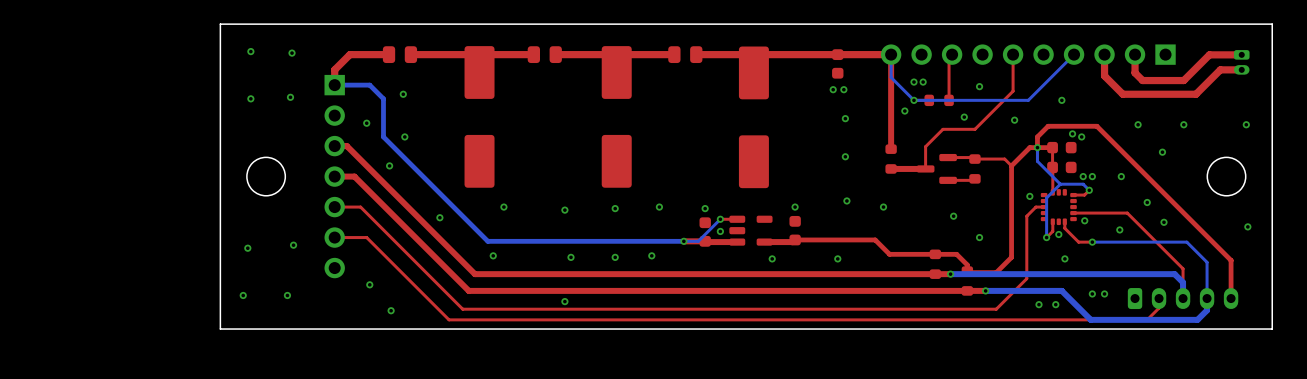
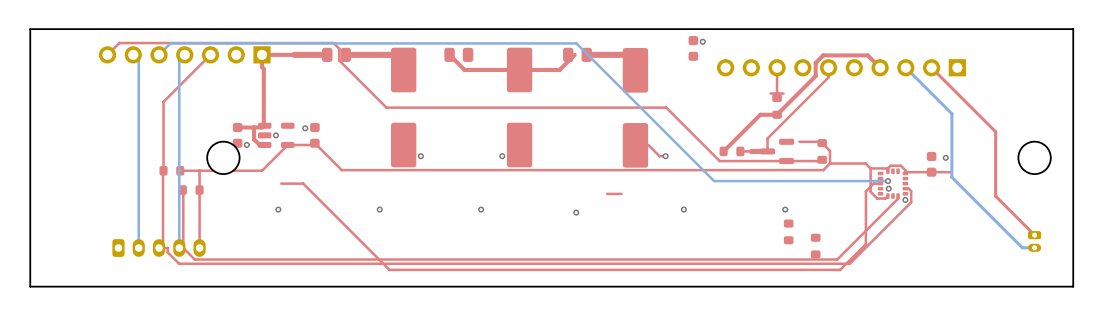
board edge: (220, 24) (220, 329) -> (184, 29) (30, 29) (30, 286) (184, 286)
via: none -> (702, 41)
via: (250, 51) -> none
via: (292, 53) -> none
top track: none -> (107, 54) (119, 43) (333, 43) (339, 48) (339, 60) (386, 107) (666, 107) (719, 161) (799, 161)
bottom track: none -> (133, 54) (138, 60) (138, 248)
bottom track: none -> (159, 54) (170, 43) (576, 43) (714, 181) (887, 181)
bottom track: none -> (184, 54) (179, 60) (179, 248)
top track: none -> (210, 54) (163, 101) (162, 248)
top track: (349, 54) (334, 69) (334, 85) -> (294, 54) (262, 54) (263, 125)
top track: (533, 54) (487, 54) (479, 62) (479, 72) -> (449, 54) (464, 69) (559, 69) (574, 54)
top track: (555, 54) (609, 54) (616, 62) (616, 72) -> none
top track: (674, 54) (625, 54) (616, 63) -> none
top track: (952, 54) (949, 57) (949, 100) -> none
top track: (1013, 54) (1013, 91) (974, 129) (942, 129) (925, 146) (925, 168) (910, 168) -> (828, 67) (828, 77) (767, 138) (767, 151)
part position: (1028, 54) -> (841, 67)
bottom track: (1074, 54) (1028, 100) (913, 100) (891, 77) (891, 54) -> none
top track: (1104, 54) (1104, 75) (1122, 94) (1196, 94) (1220, 69) (1241, 69) -> none
top track: (1135, 54) (1135, 72) (1142, 80) (1183, 80) (1209, 54) (1241, 54) -> none
part position: (1241, 62) -> (1034, 241)
part position: (837, 63) -> (693, 48)
top track: none -> (777, 67) (777, 98)
top track: none -> (880, 67) (867, 55) (823, 55) (815, 62) (815, 76) (777, 114) (760, 114) (723, 151)
bottom track: none -> (905, 67) (951, 113) (951, 177) (1022, 247) (1034, 247)
top track: none -> (931, 67) (995, 131) (995, 196) (1034, 235)
top track: (753, 74) (753, 66) (766, 54) (891, 54) (891, 149) -> none
via: (913, 82) -> none
via: (923, 82) -> none
bottom track: (334, 85) (369, 85) (383, 98) (383, 136) (487, 241) (698, 241) (720, 219) -> none
via: (979, 86) -> none
via: (833, 89) -> none
via: (843, 89) -> none
via: (403, 94) -> none
via: (290, 97) -> none
via: (250, 98) -> none
via: (913, 100) -> none
part rotation: 0° (939, 100) -> 90° clockwise (777, 106)
part position: (939, 100) -> (777, 106)
via: (1061, 100) -> none
via: (904, 111) -> none
via: (964, 117) -> none
via: (845, 118) -> none
via: (1014, 120) -> none
via: (366, 123) -> none
via: (1138, 124) -> none
via: (1183, 124) -> none
via: (1246, 124) -> none
via: (1072, 133) -> none
via: (404, 136) -> none
via: (1081, 136) -> none
top track: none -> (263, 125) (262, 127) (237, 127)
top track: none -> (254, 127) (254, 139) (259, 145) (264, 145)
via: none -> (305, 128)
top track: (334, 146) (346, 146) (474, 274) (950, 274) -> none
top track: (1037, 147) (1037, 136) (1048, 126) (1096, 126) (1231, 260) (1231, 298) -> none
bottom track: (1037, 147) (1037, 161) (1060, 184) -> none
via: (1037, 147) -> none
part: (1061, 147) -> none
part: none -> (237, 135)
part: none -> (276, 135)
via: none -> (275, 135)
part: none -> (314, 135)
via: (1162, 152) -> none
via: (845, 156) -> none
part rotation: 0° (891, 159) -> 90° clockwise (732, 151)
part position: (891, 159) -> (732, 151)
top track: (974, 159) (1004, 159) (1011, 165) -> (822, 143) (830, 150) (830, 163)
via: none -> (246, 144)
top track: none -> (648, 145) (659, 156) (665, 156)
via: (389, 165) -> none
top track: (1011, 165) (1011, 257) (996, 272) (968, 272) (967, 264) (956, 254) (889, 254) (875, 239) (795, 239) (793, 242) (764, 242) -> none
top track: (1011, 165) (1029, 147) (1052, 147) (1052, 189) -> none
part: (1061, 167) -> none
top track: none -> (751, 151) (740, 151)
part position: (936, 168) -> (777, 151)
via: none -> (420, 156)
via: none -> (502, 156)
via: none -> (665, 156)
top track: (334, 176) (354, 176) (468, 290) (985, 290) -> none
part rotation: 0° (334, 176) -> 90° clockwise (184, 54)
part position: (334, 176) -> (184, 54)
via: (1083, 176) -> none
via: (1092, 176) -> none
top track: none -> (830, 163) (823, 170) (341, 170) (314, 143) (313, 145) (287, 145) (262, 170) (180, 170)
top track: none -> (830, 163) (865, 163) (870, 168)
bottom track: (1060, 184) (1083, 184) (1089, 190) -> none
bottom track: (1060, 184) (1046, 197) (1046, 237) -> none
part: none -> (931, 164)
top track: (1089, 190) (1084, 195) (1073, 195) -> (870, 168) (887, 168) (890, 165) (900, 165) (905, 170) (905, 173)
via: (1089, 190) -> none
part: none -> (171, 170)
top track: none -> (199, 170) (199, 248)
top track: none -> (950, 172) (905, 172)
via: (1029, 196) -> none
via: (846, 200) -> none
via: (1147, 202) -> none
via: none -> (887, 181)
via: (503, 207) -> none
via: (659, 207) -> none
via: (795, 207) -> none
via: (883, 207) -> none
via: (615, 208) -> none
via: (705, 208) -> none
via: (564, 210) -> none
via: none -> (888, 188)
top track: (1077, 213) (1127, 213) (1183, 268) (1183, 298) -> (908, 188) (911, 191) (911, 202) (849, 263) (179, 263) (167, 252) (167, 248) (159, 248)
top track: none -> (182, 190) (183, 248)
part: none -> (191, 190)
via: (953, 216) -> none
via: (439, 217) -> none
via: (720, 219) -> none
via: (1084, 220) -> none
top track: (1052, 221) (1052, 231) (1046, 237) -> (887, 196) (885, 198) (877, 198) (870, 191) (870, 168)
via: (1164, 222) -> none
top track: (1064, 224) (1064, 228) (1078, 242) (1092, 242) -> (898, 198) (837, 259) (194, 259) (183, 248)
via: none -> (905, 199)
via: (1247, 226) -> none
via: (1119, 229) -> none
part: (750, 230) -> none
part: (795, 230) -> none
via: (720, 231) -> none
part: (705, 232) -> none
via: (1058, 234) -> none
via: none -> (278, 209)
top track: (334, 237) (366, 237) (449, 319) (1147, 319) (1159, 308) (1159, 298) -> none
via: none -> (379, 209)
via: none -> (481, 209)
via: none -> (683, 209)
via: none -> (785, 209)
via: (979, 237) -> none
via: (1046, 237) -> none
top track: (683, 241) (737, 242) -> none
bottom track: (1092, 242) (1186, 242) (1207, 262) (1207, 310) (1197, 319) (1090, 319) (1061, 290) (985, 290) -> none
via: (1092, 242) -> none
via: (293, 245) -> none
via: (247, 248) -> none
via: (493, 255) -> none
via: (651, 255) -> none
via: (570, 257) -> none
via: (615, 257) -> none
via: (772, 258) -> none
via: (837, 258) -> none
via: (1064, 258) -> none
bottom track: (950, 274) (1174, 274) (1183, 282) (1183, 298) -> none
via: (950, 274) -> none
part: none -> (159, 248)
via: (369, 284) -> none
via: (985, 290) -> none
via: (1092, 293) -> none
via: (1104, 293) -> none
via: (243, 295) -> none
via: (287, 295) -> none
part: (1183, 298) -> none
via: (564, 301) -> none
via: (1038, 304) -> none
via: (1055, 304) -> none
via: (391, 310) -> none

